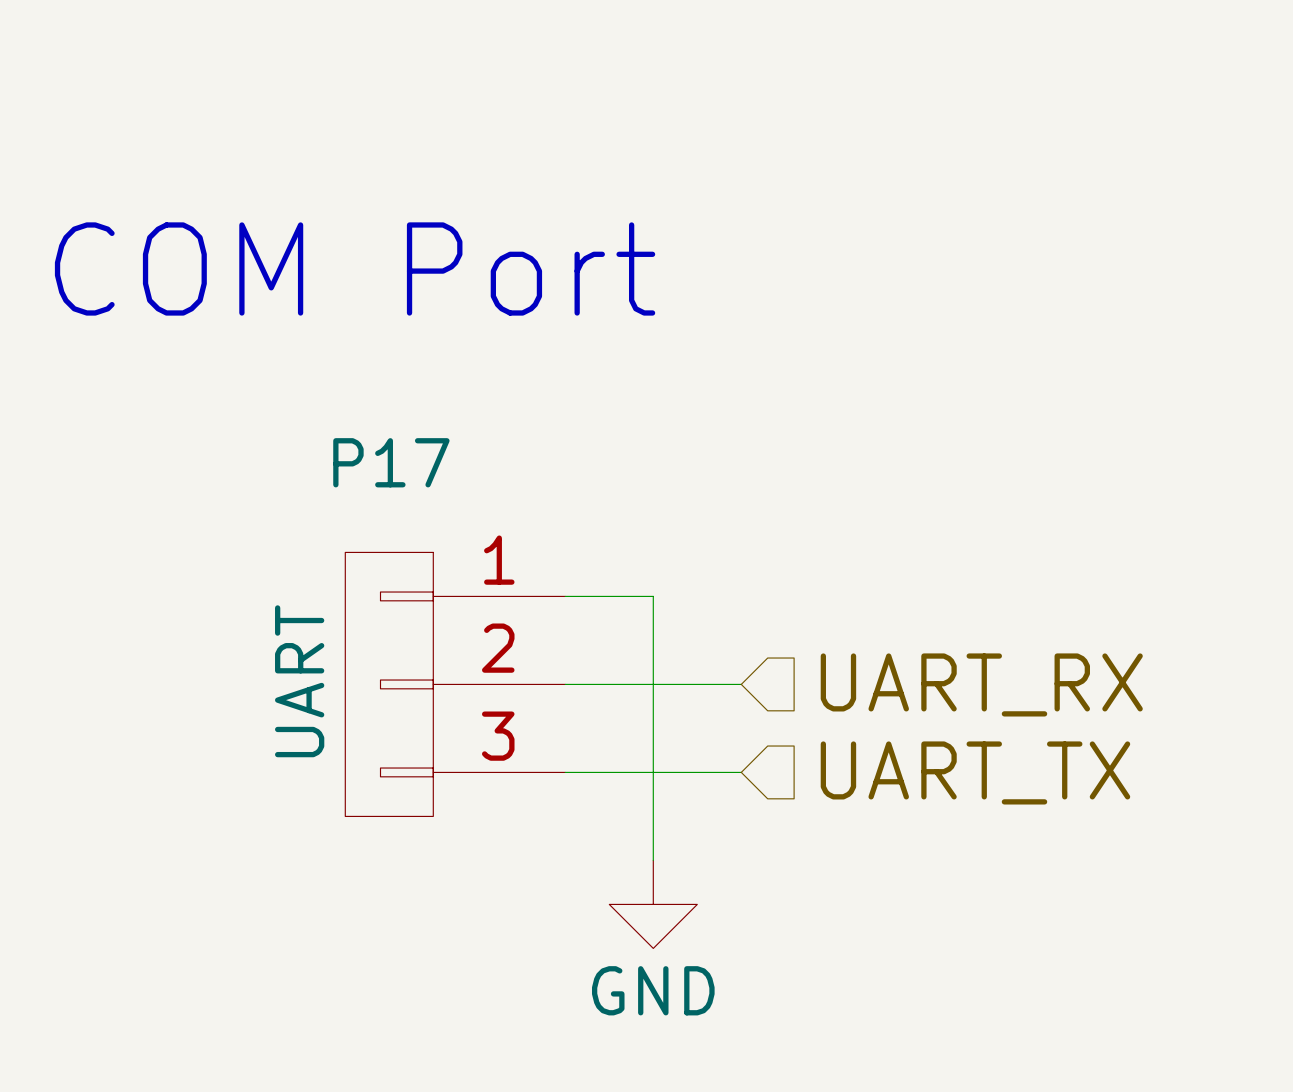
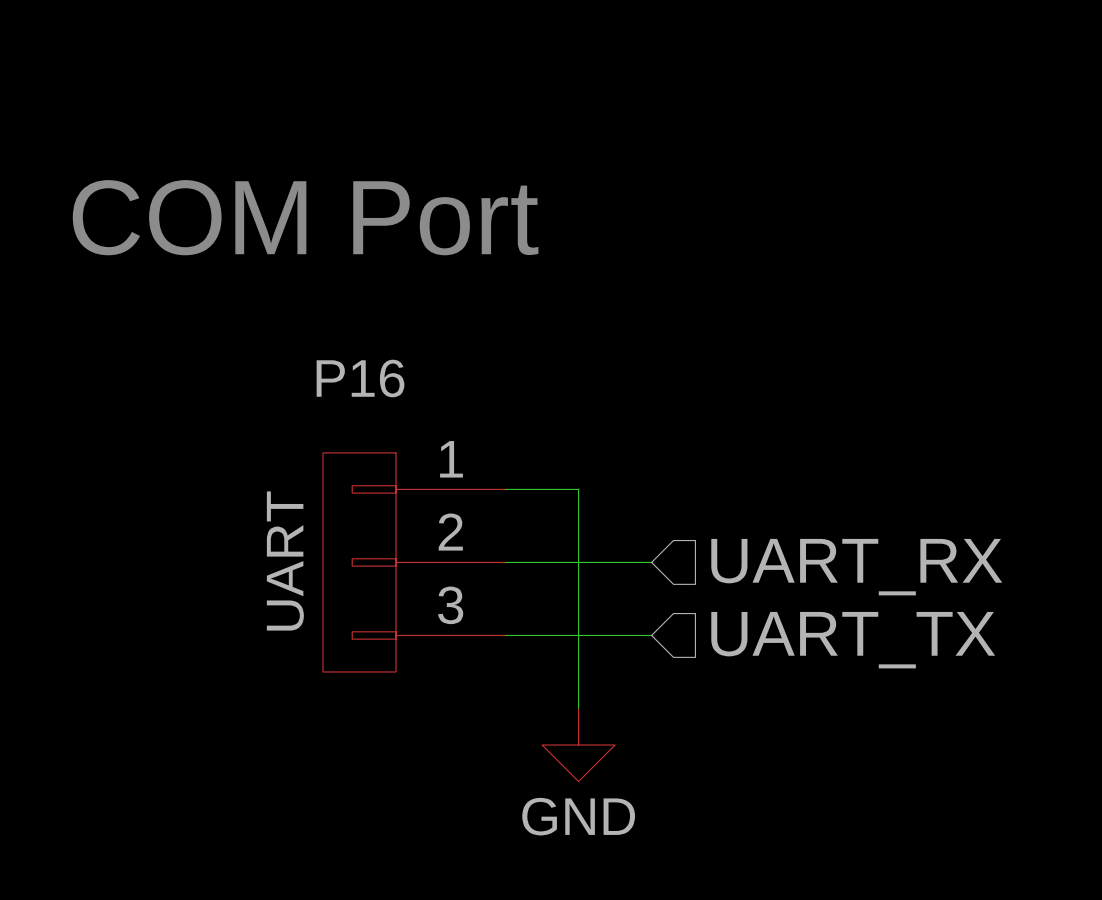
P17 name: P17 (391, 462) -> P16 (360, 378)

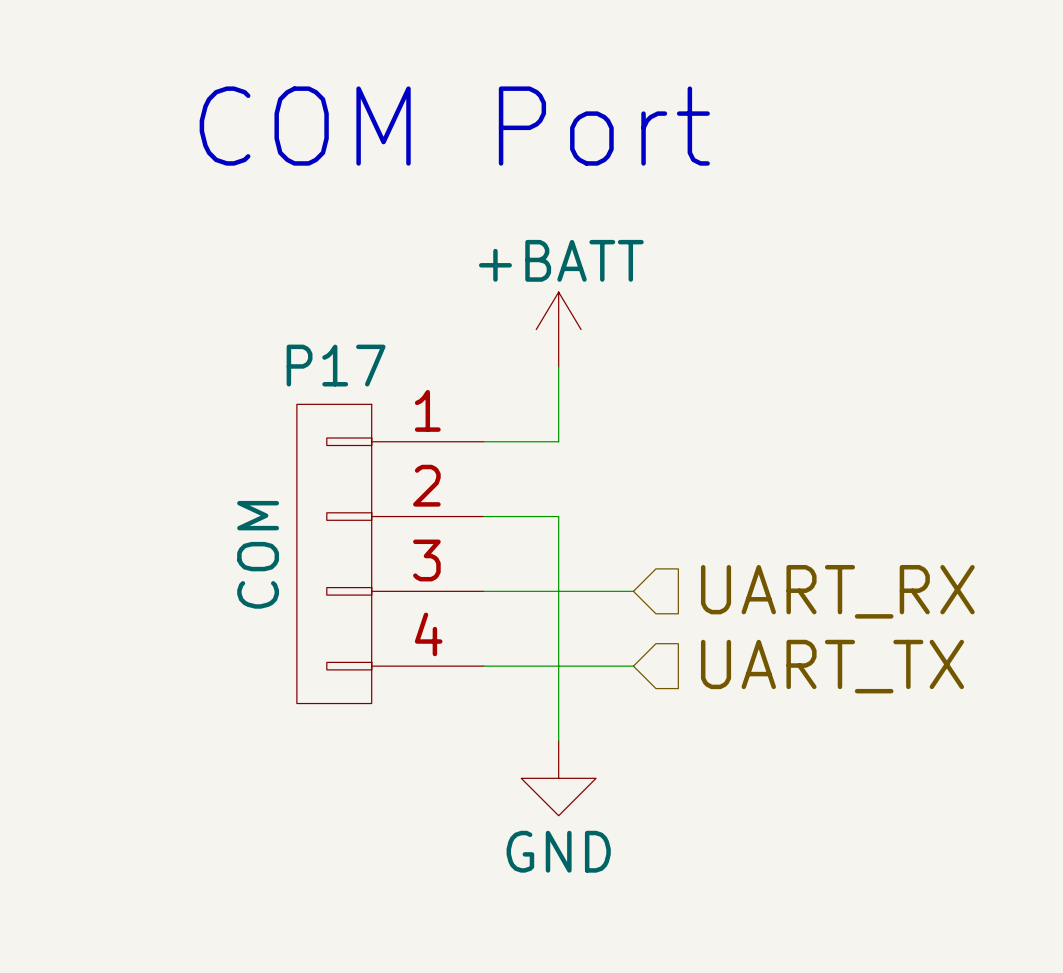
text position: COM Port (305, 217) -> COM Port (454, 126)
power symbol: none -> +BATT (558, 329)
wire: none -> (558, 366) (558, 441) (483, 441)
P17: none -> COM (390, 553)
P16: UART (414, 562) -> none

